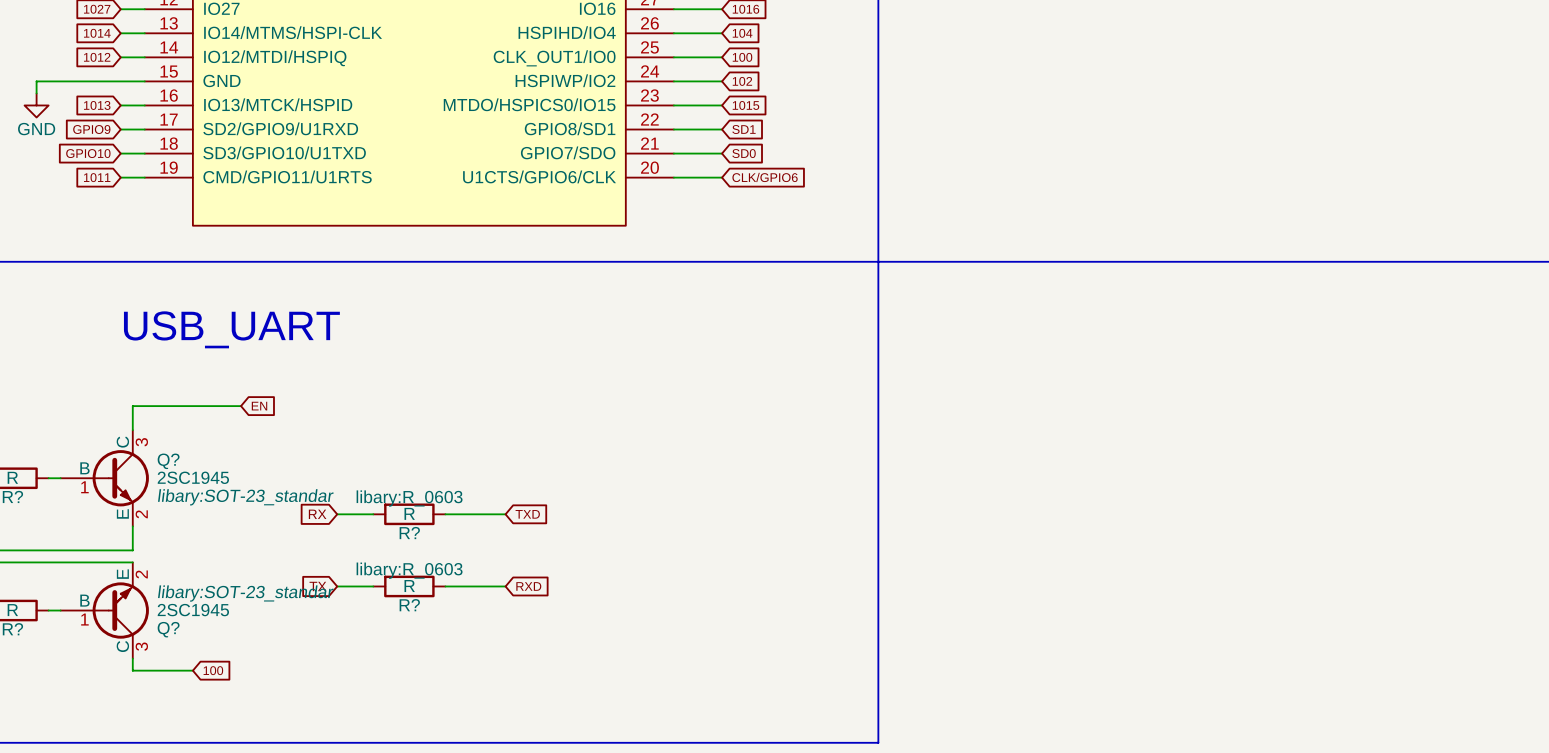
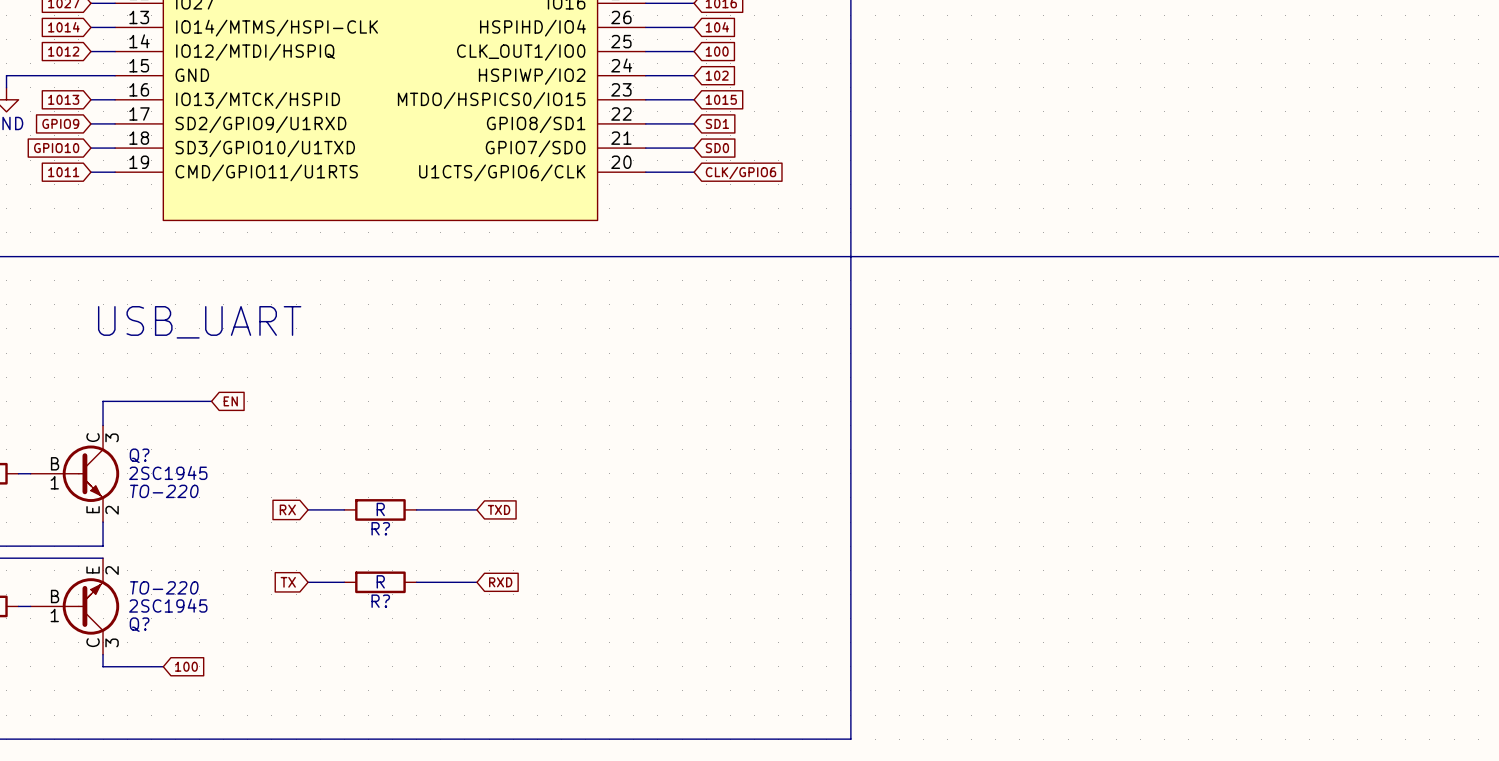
Q? text: libary:SOT-23_standar (245, 497) -> TO-220 (164, 491)
R? text: libary:R_0603 (409, 498) -> none
R? text: libary:R_0603 (409, 570) -> none
Q? text: libary:SOT-23_standar (245, 593) -> TO-220 (164, 587)

